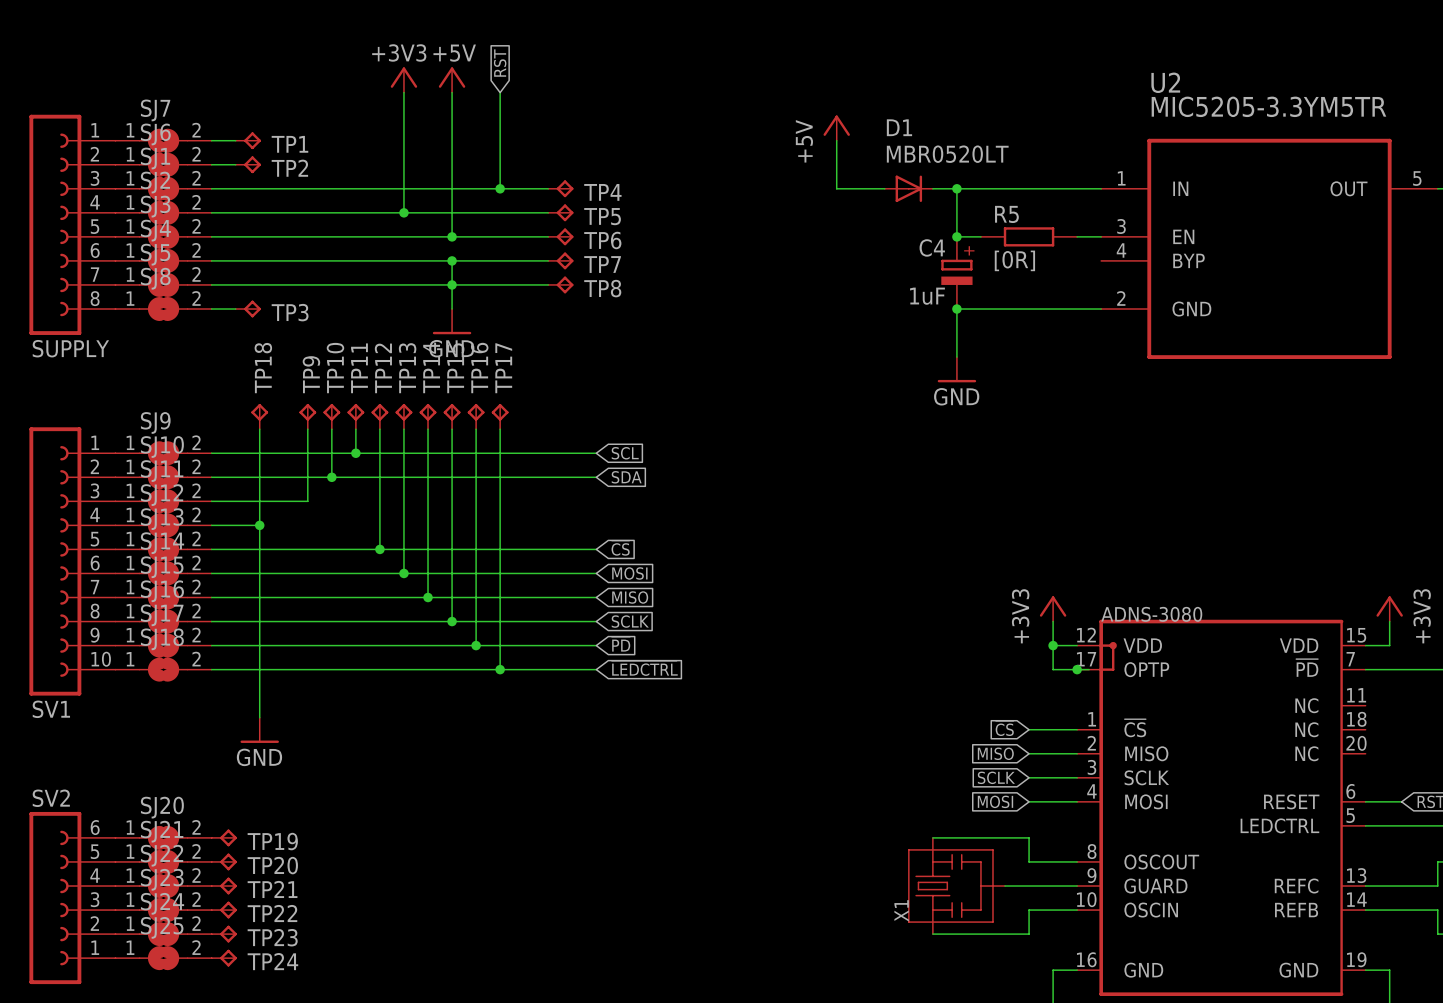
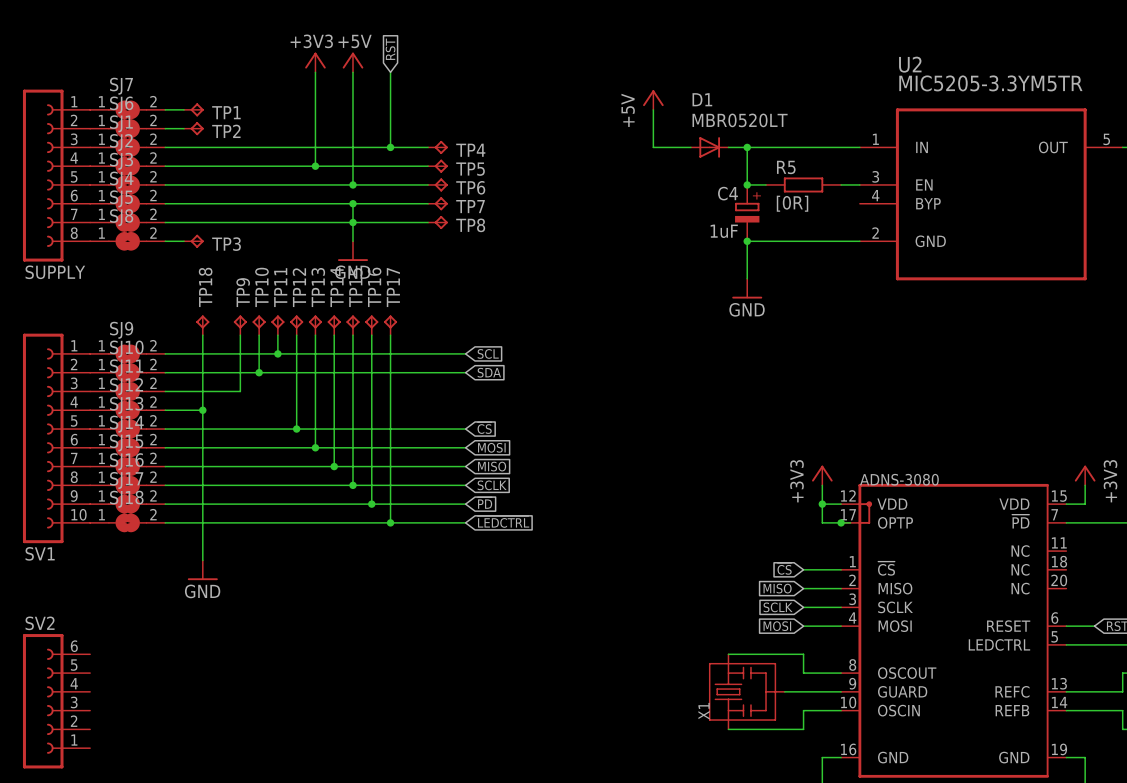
SJ20: (163, 837) -> none
TP19: (224, 837) -> none
SJ21: (163, 861) -> none
TP20: (224, 861) -> none
SJ22: (163, 886) -> none
TP21: (224, 886) -> none
SJ23: (163, 910) -> none
TP22: (224, 910) -> none
SJ24: (163, 934) -> none
TP23: (224, 934) -> none
SJ25: (163, 958) -> none
TP24: (224, 958) -> none

